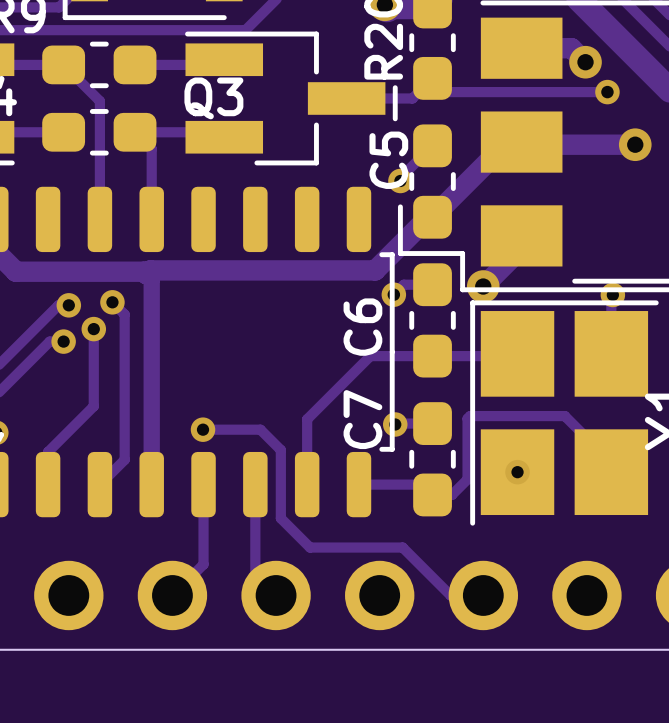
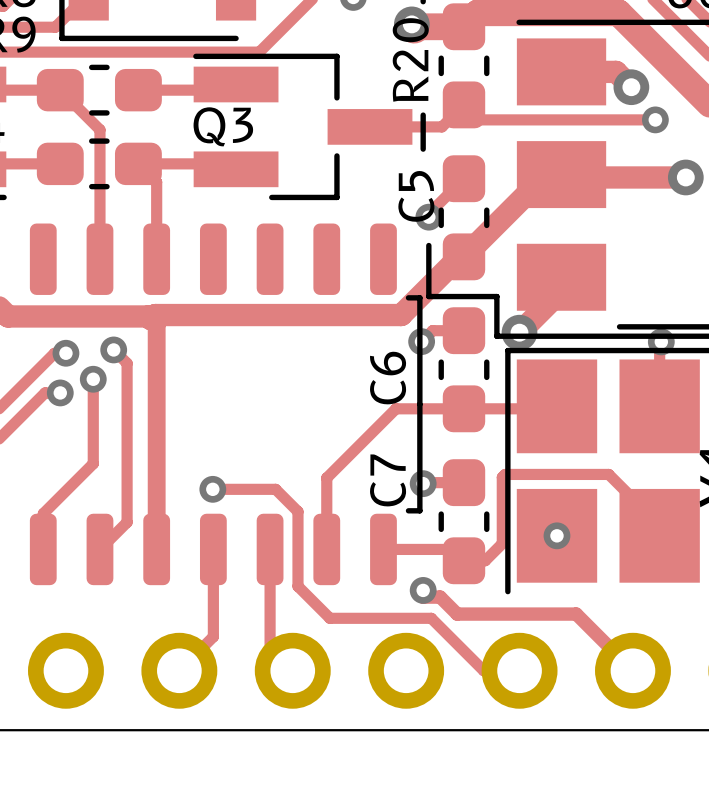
track: none -> (423, 591) (423, 597) (440, 597) (457, 614) (576, 614) (632, 670)
via: none -> (423, 590)

